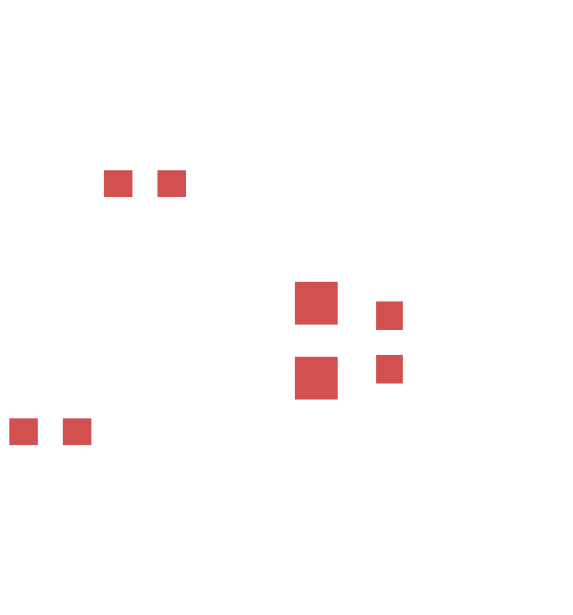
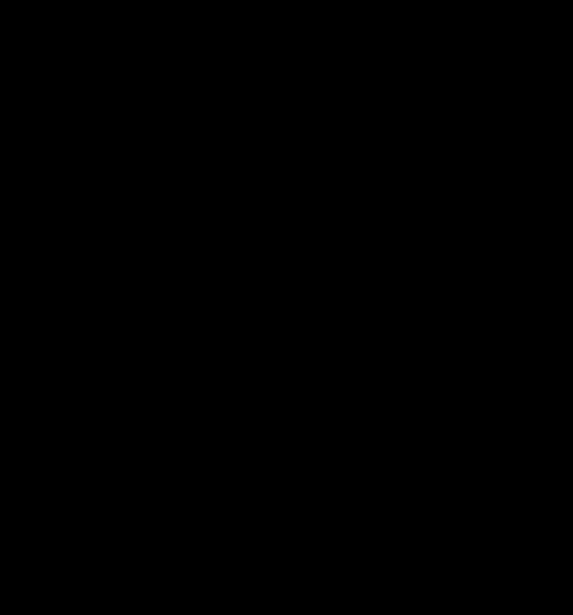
part: (144, 183) -> none
part: (316, 340) -> none
part: (389, 342) -> none
part: (50, 431) -> none

